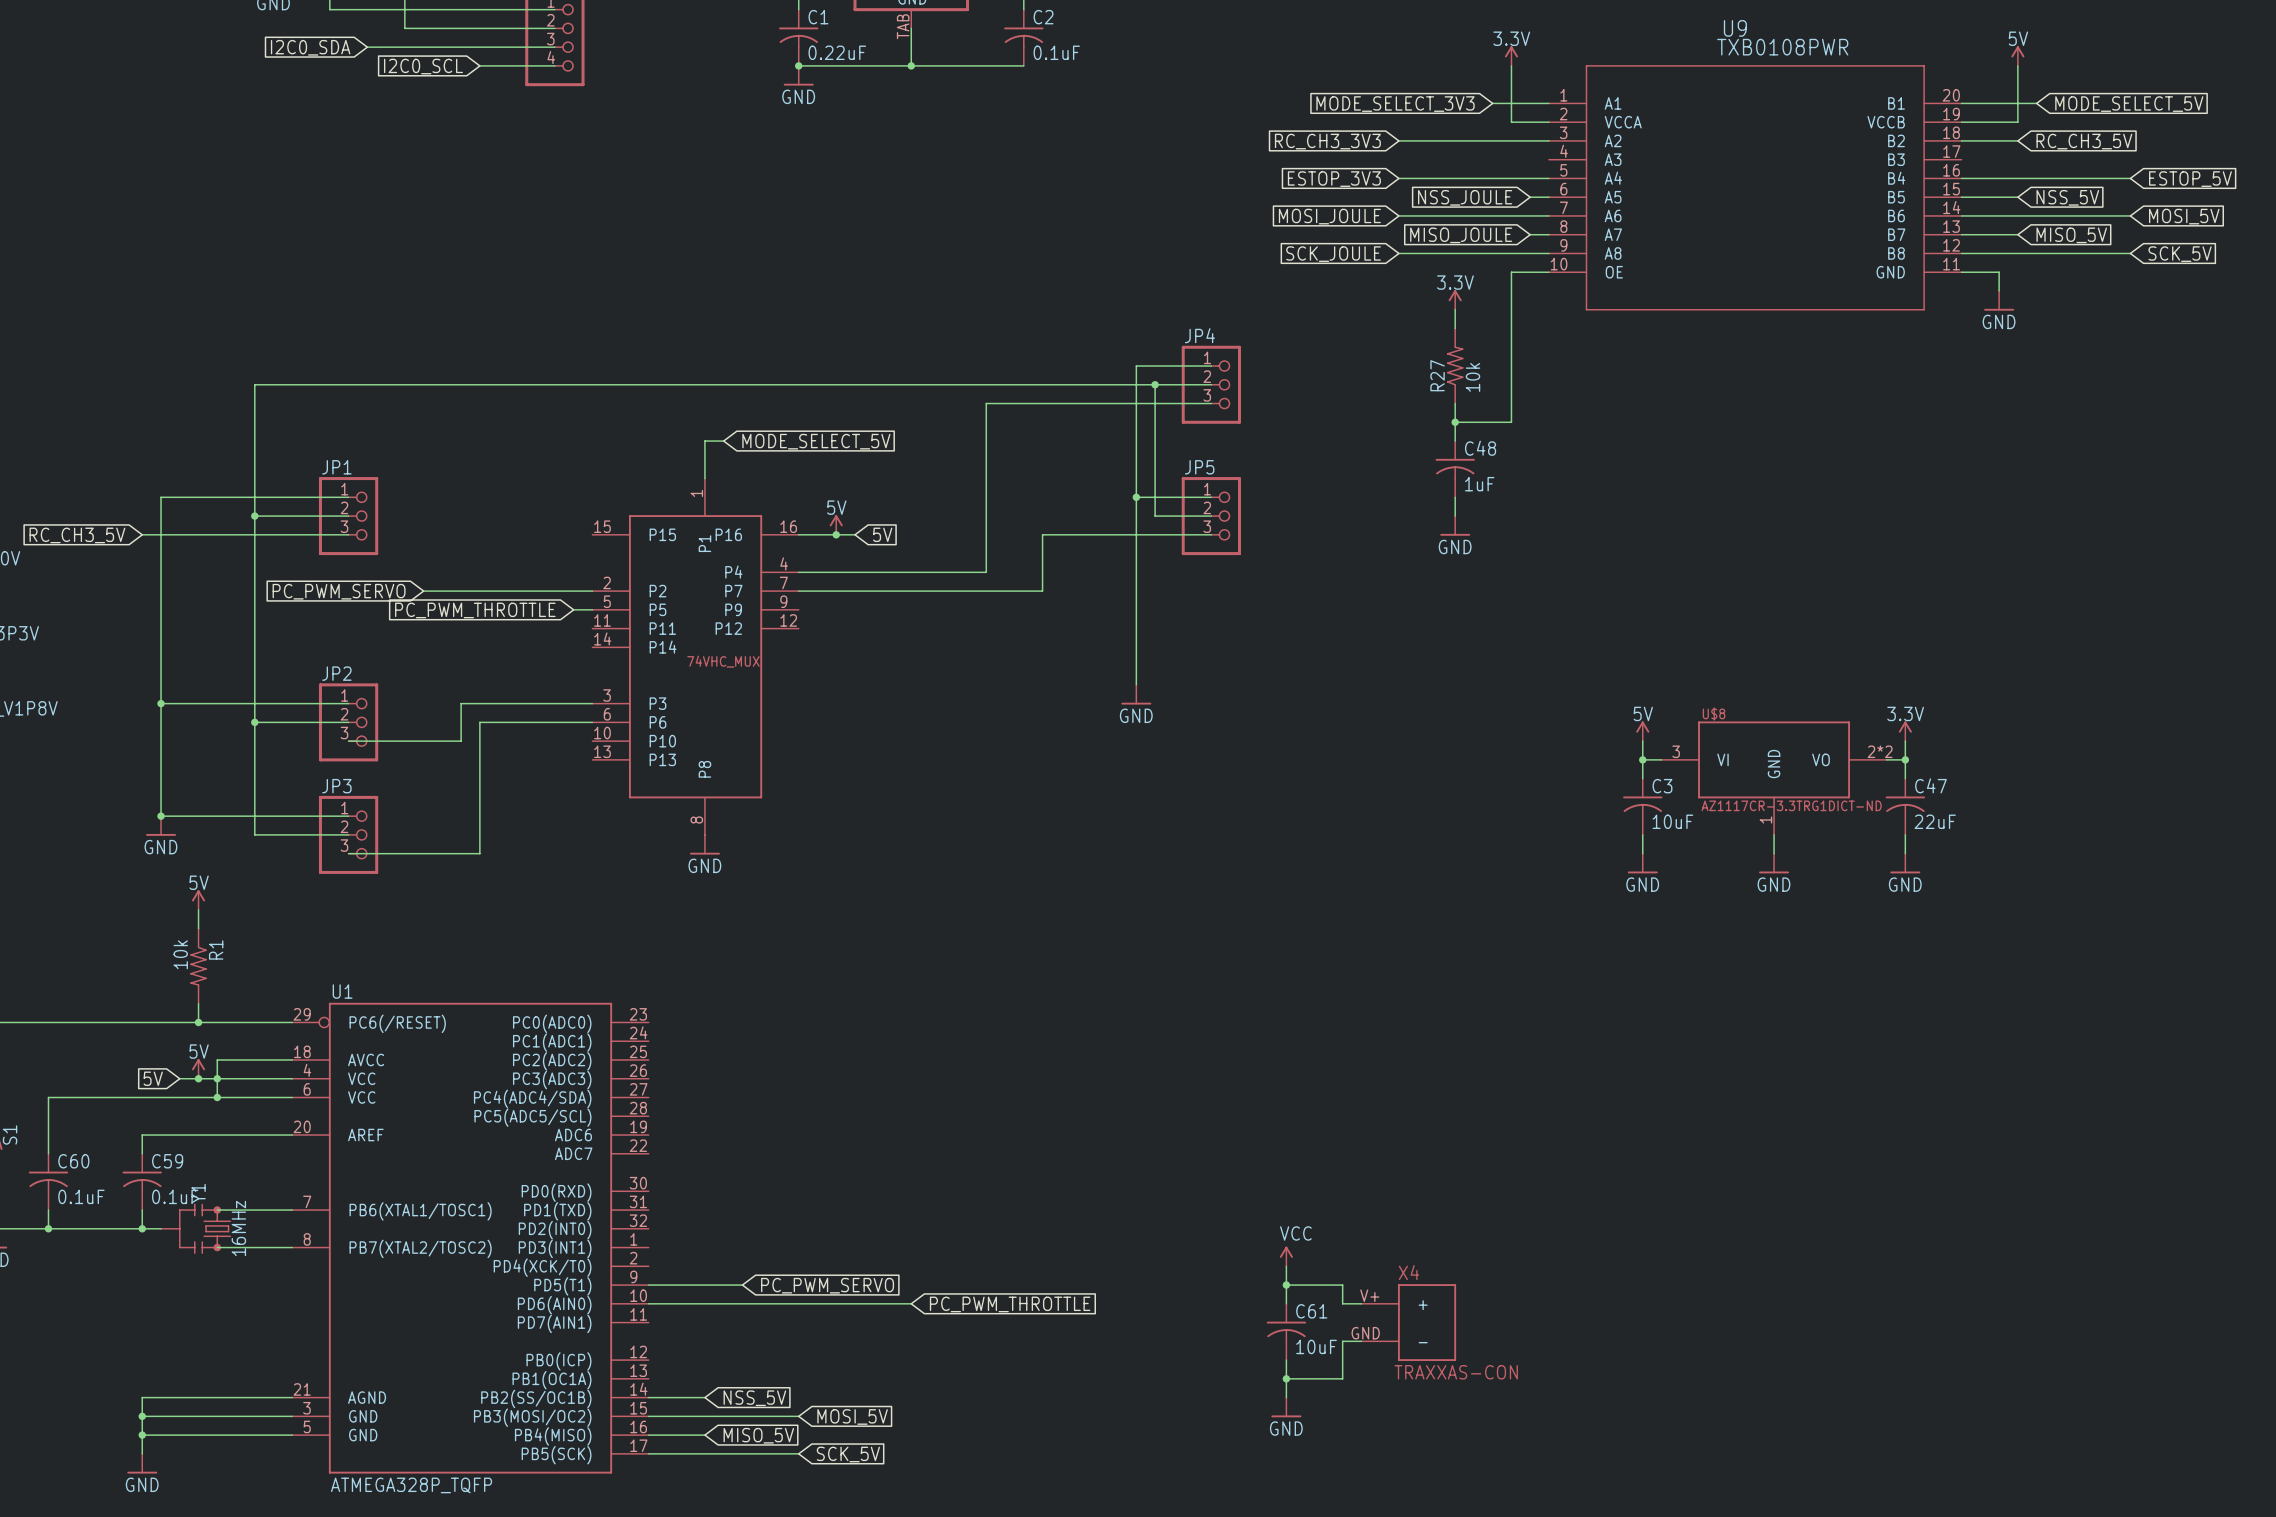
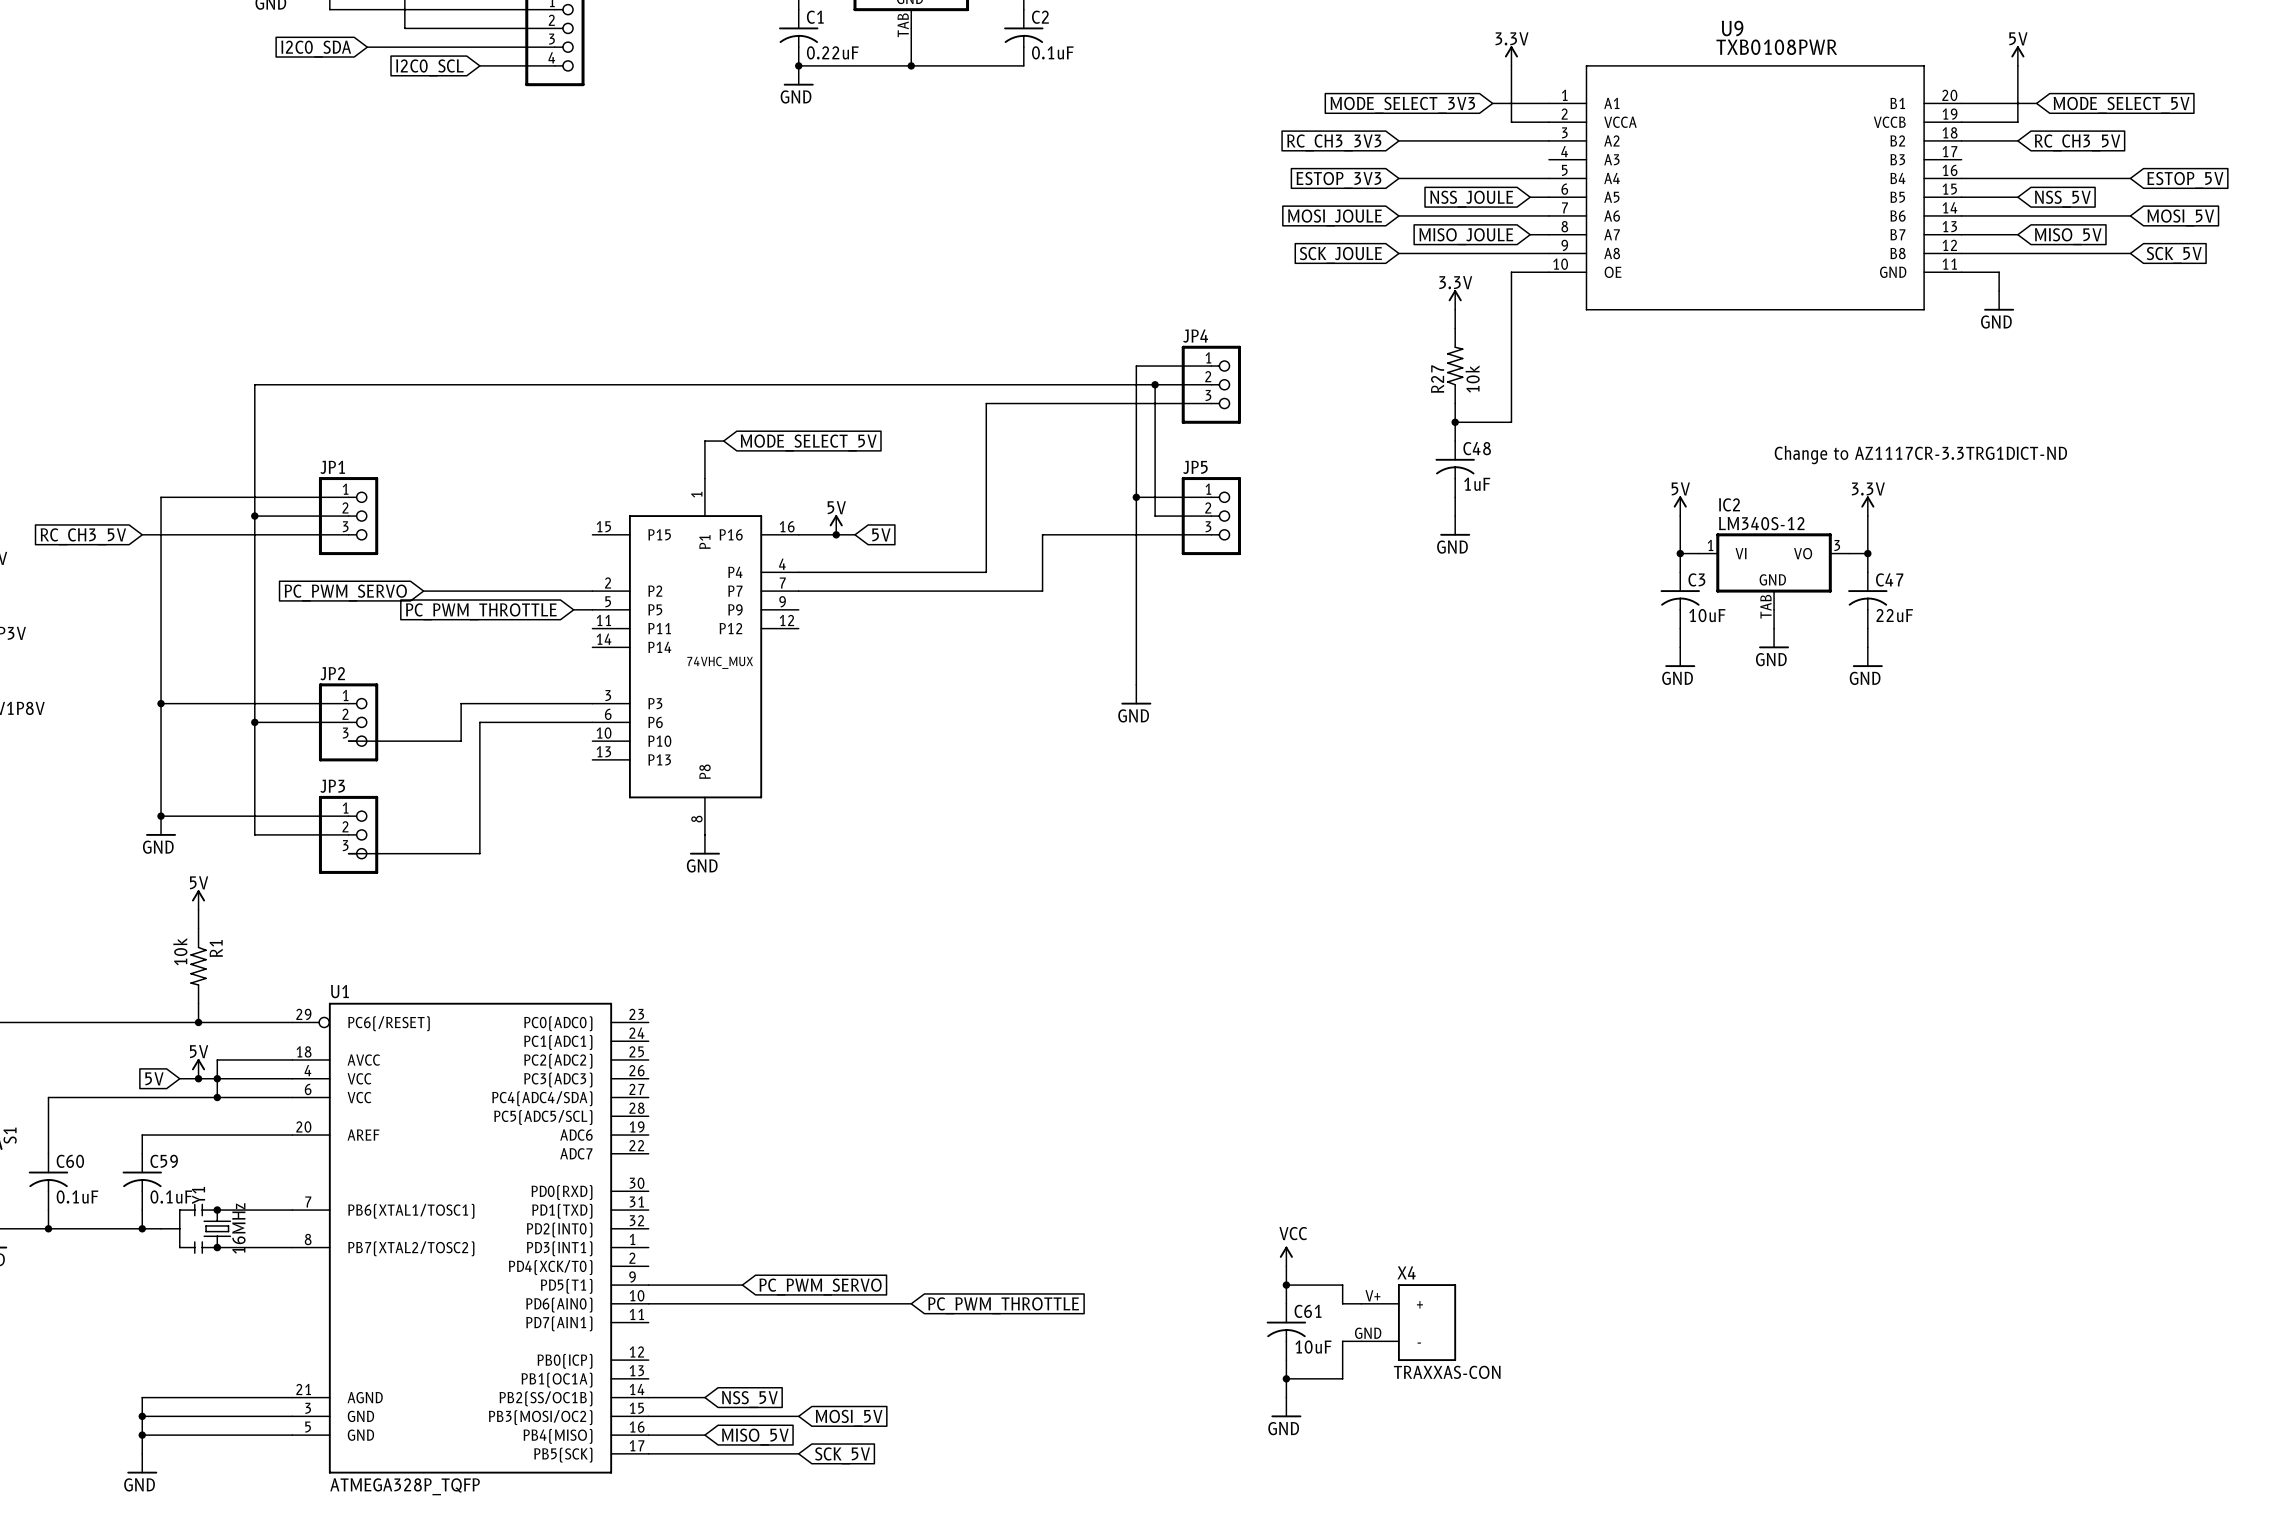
text: none -> Change to AZ1117CR-3.3TRG1DICT-ND (1920, 455)
power symbol: none -> 5V (1680, 506)
power symbol: none -> 3.3V (1867, 506)
wire: none -> (1680, 516) (1680, 572)
wire: none -> (1867, 516) (1867, 572)
wire: none -> (1680, 553) (1699, 553)
junction: none -> (1680, 553)
wire: none -> (1849, 553) (1867, 553)
junction: none -> (1867, 553)
IC2: none -> LM340S-12 (1774, 571)
wire: none -> (1774, 609) (1774, 628)
wire: none -> (1680, 628) (1680, 647)
wire: none -> (1867, 628) (1867, 647)
power symbol: none -> GND (1774, 638)
power symbol: none -> GND (1680, 657)
power symbol: none -> GND (1867, 657)
power symbol: 5V (1642, 731) -> none
power symbol: 3.3V (1905, 731) -> none
wire: (1642, 741) (1642, 778) -> none
wire: (1905, 741) (1905, 778) -> none
wire: (1642, 759) (1661, 759) -> none
junction: (1642, 759) -> none
wire: (1886, 759) (1905, 759) -> none
junction: (1905, 759) -> none
U$8: AZ1117CR-3.3TRG1DICT-ND (1774, 778) -> none
C3 position: (1642, 806) -> (1680, 600)
C47 position: (1905, 806) -> (1867, 600)
wire: (1642, 834) (1642, 853) -> none
wire: (1774, 834) (1774, 853) -> none
wire: (1905, 834) (1905, 853) -> none
power symbol: GND (1642, 863) -> none
power symbol: GND (1774, 863) -> none
power symbol: GND (1905, 863) -> none

